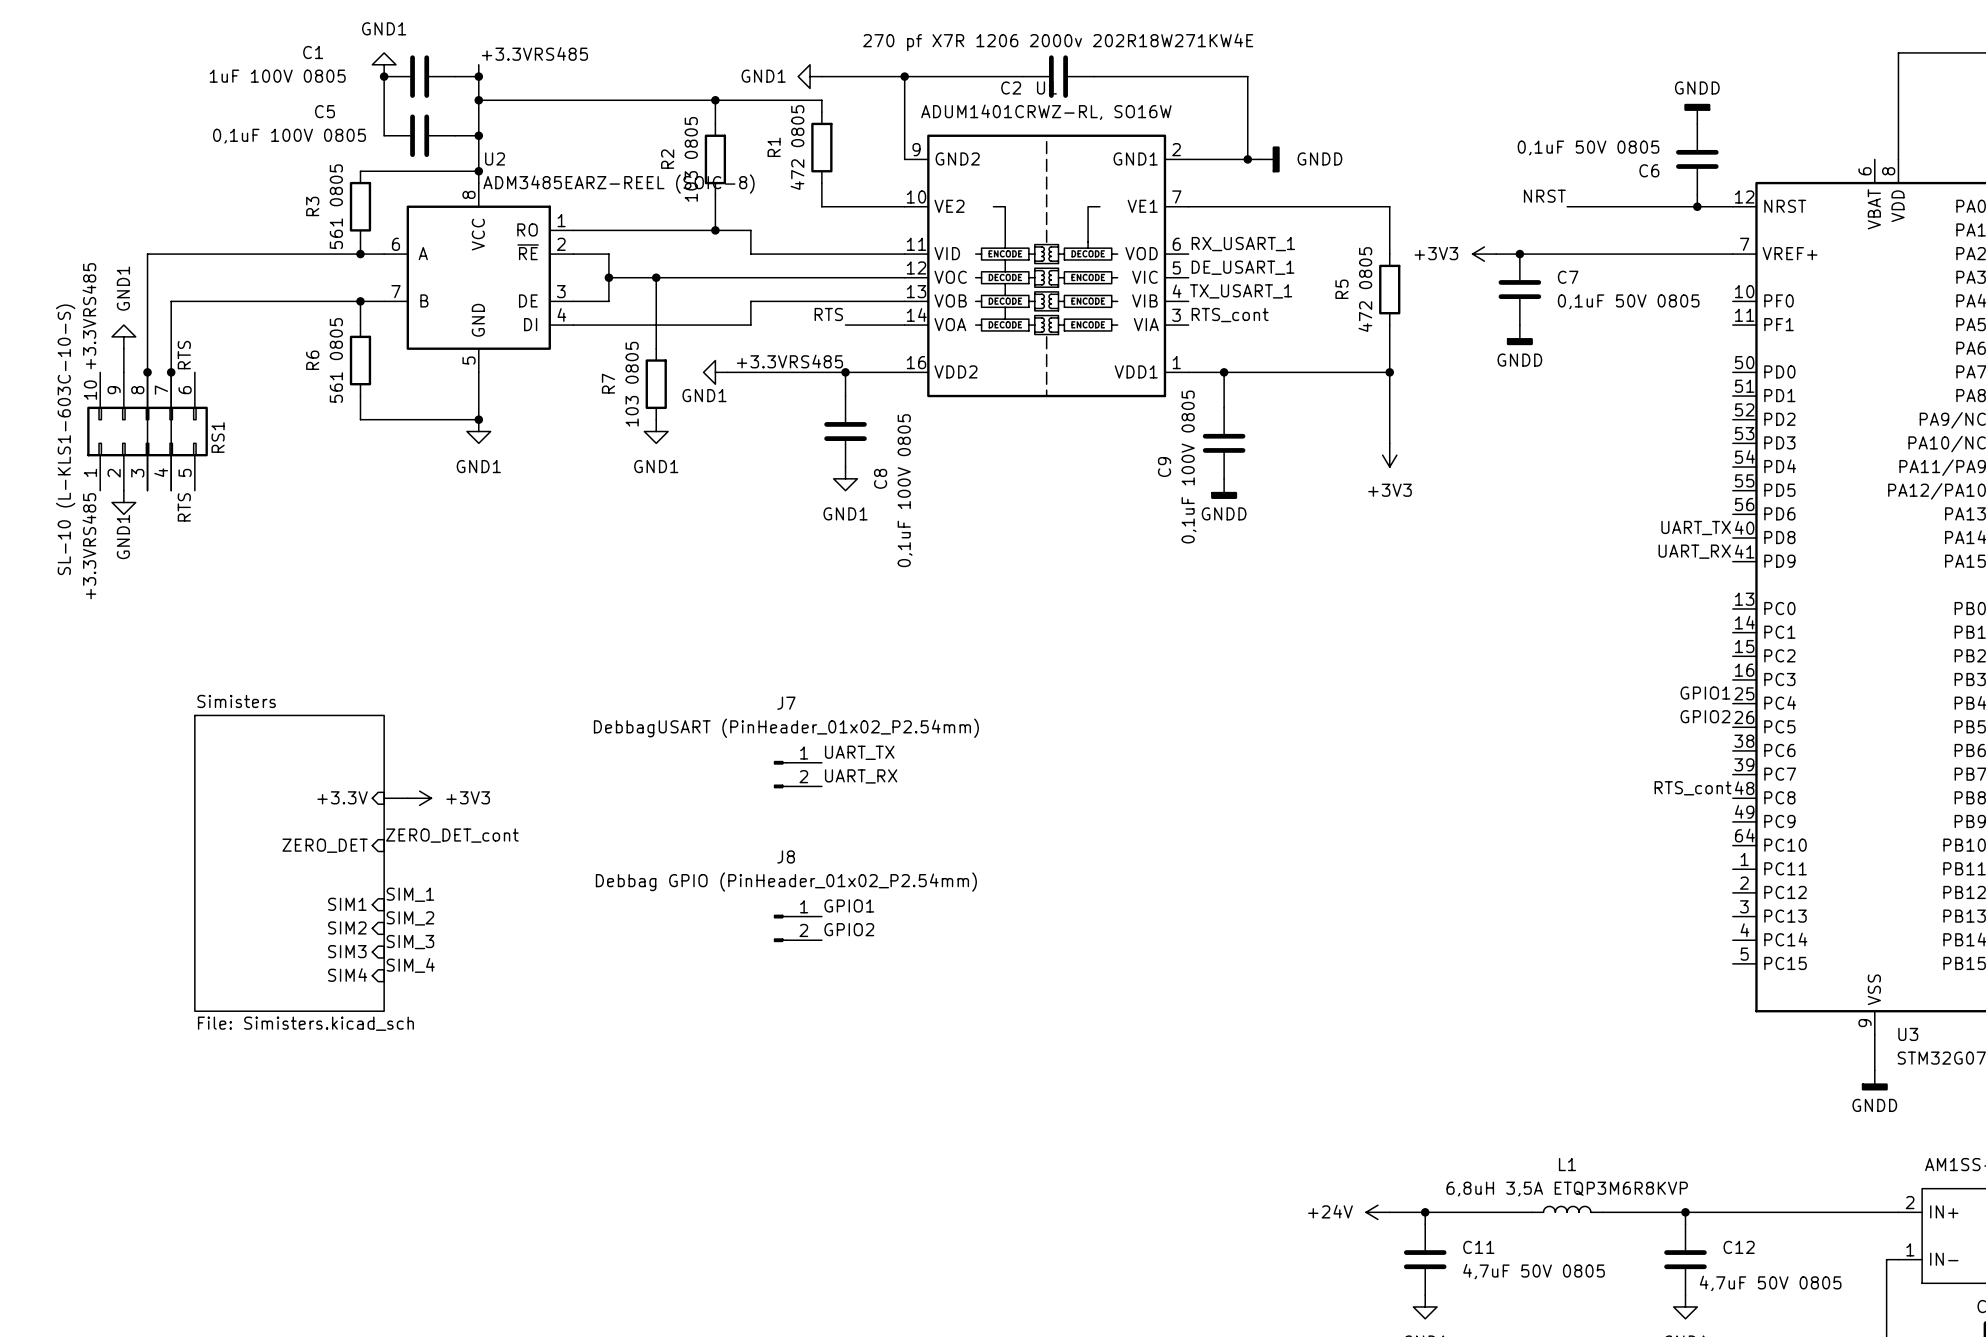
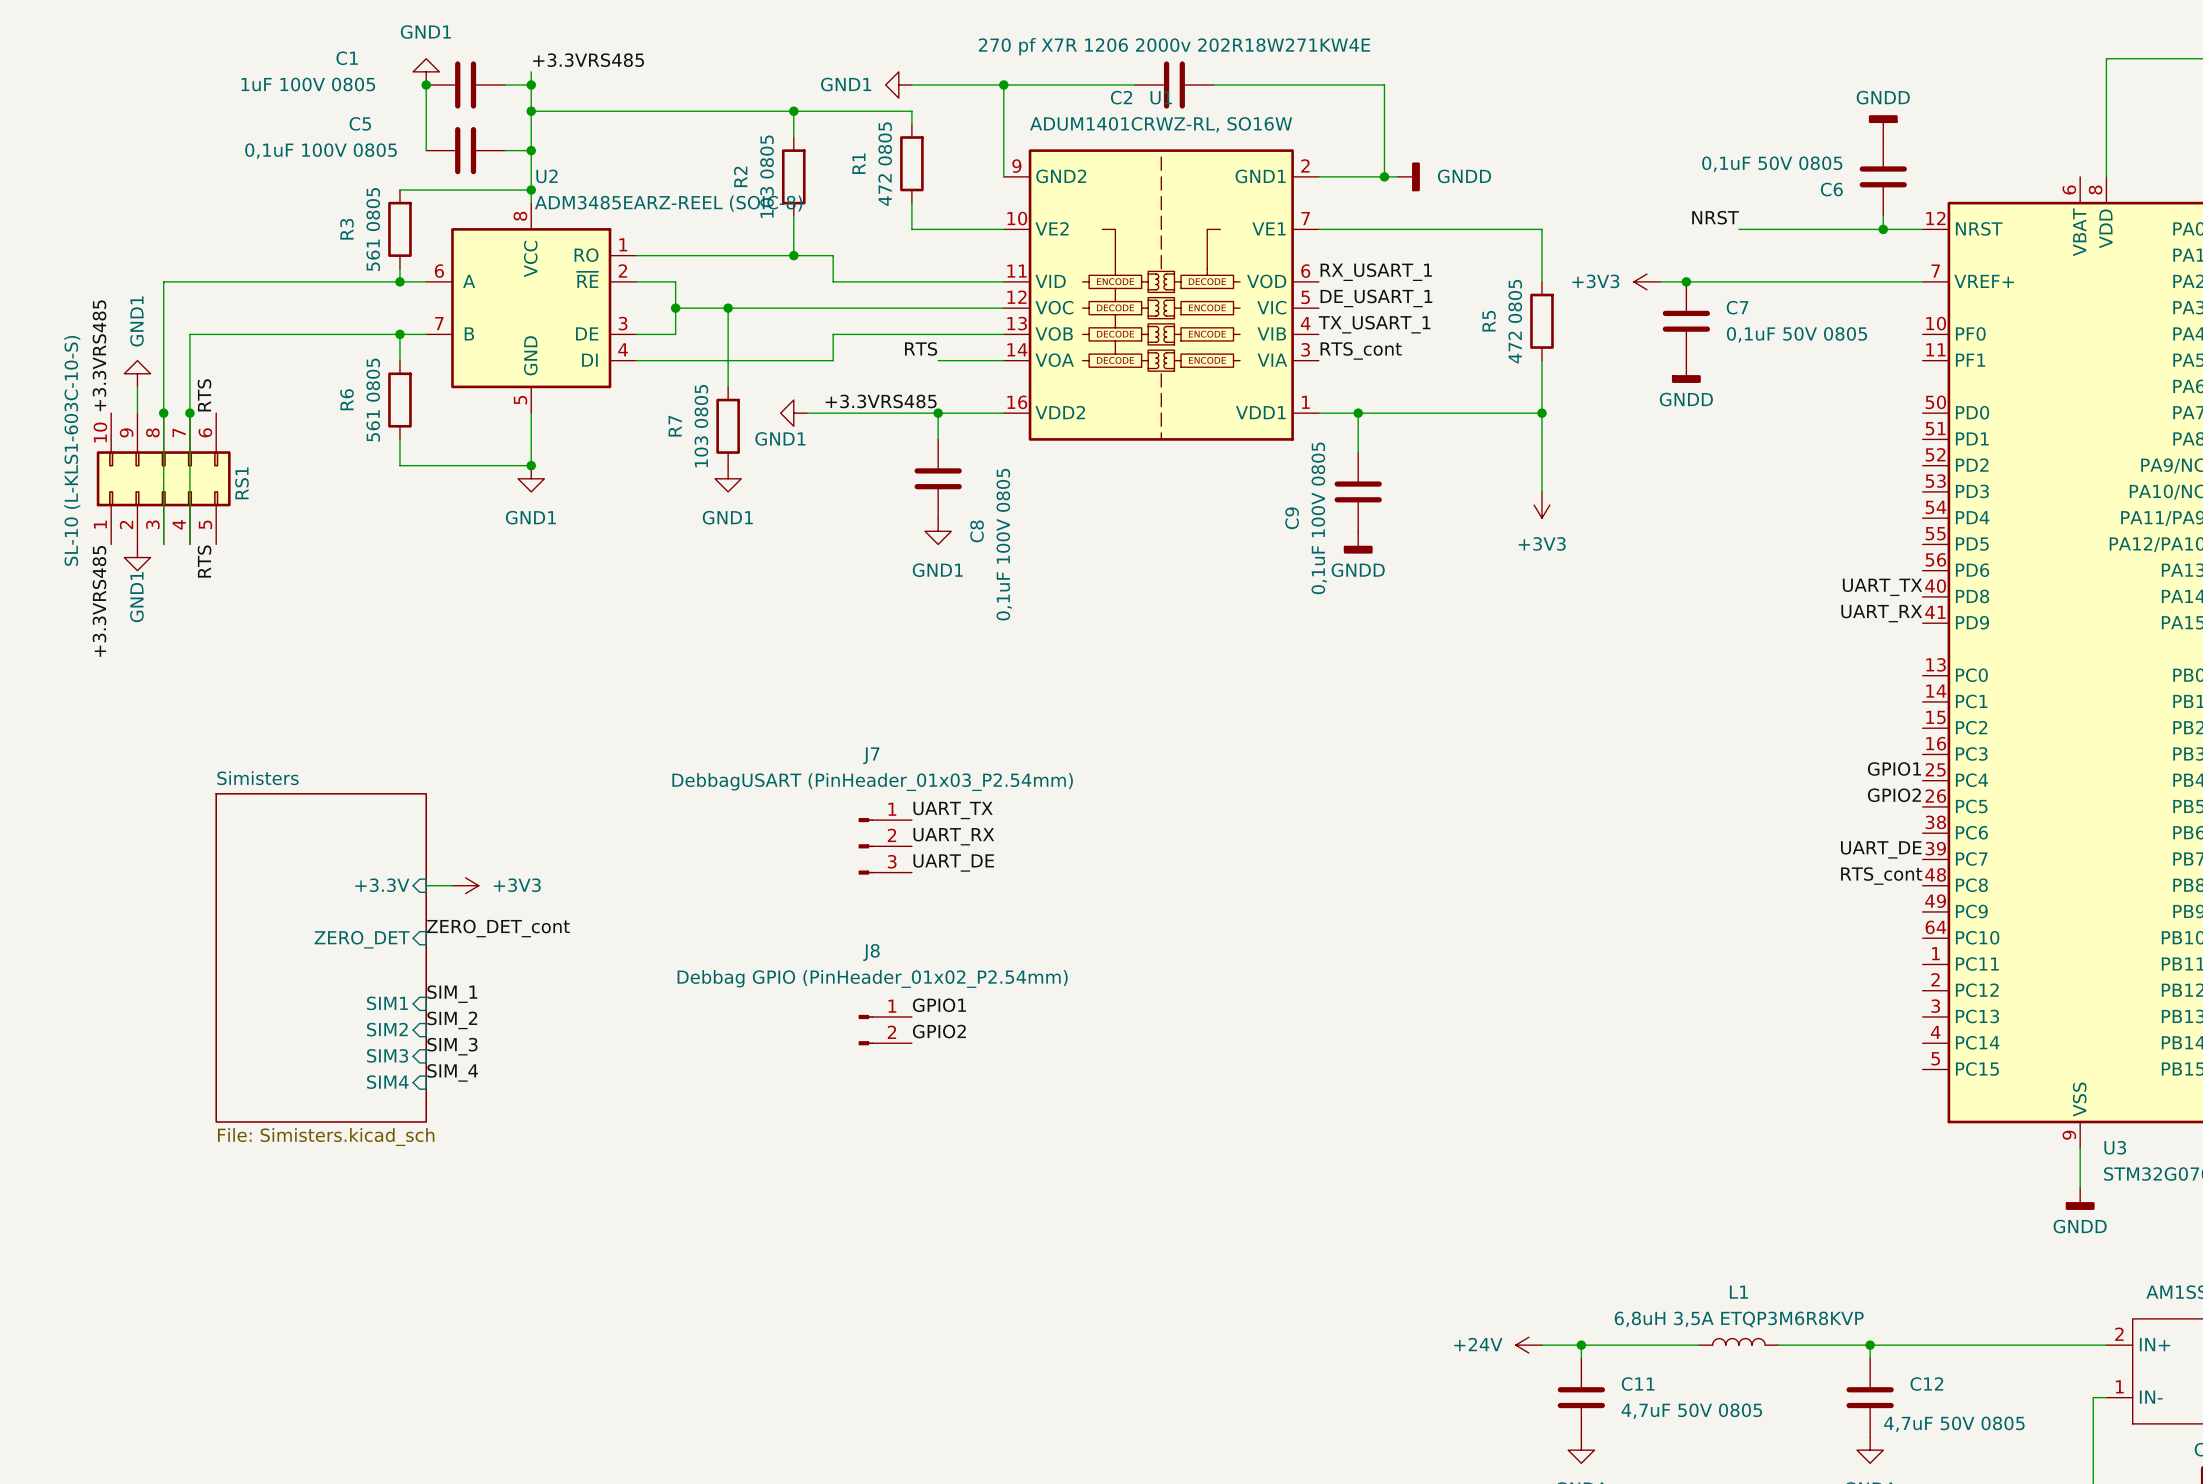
J7 value: DebbagUSART (PinHeader_01x02_P2.54mm) (786, 728) -> DebbagUSART (PinHeader_01x03_P2.54mm) (872, 782)
label: none -> UART_TX (953, 810)
label: UART_TX (859, 752) -> UART_RX (953, 836)
J7 symbol: [773, 760, 822, 789] -> [858, 817, 912, 875]
label: none -> UART_DE (1881, 849)
label: UART_RX (861, 776) -> UART_DE (953, 863)

